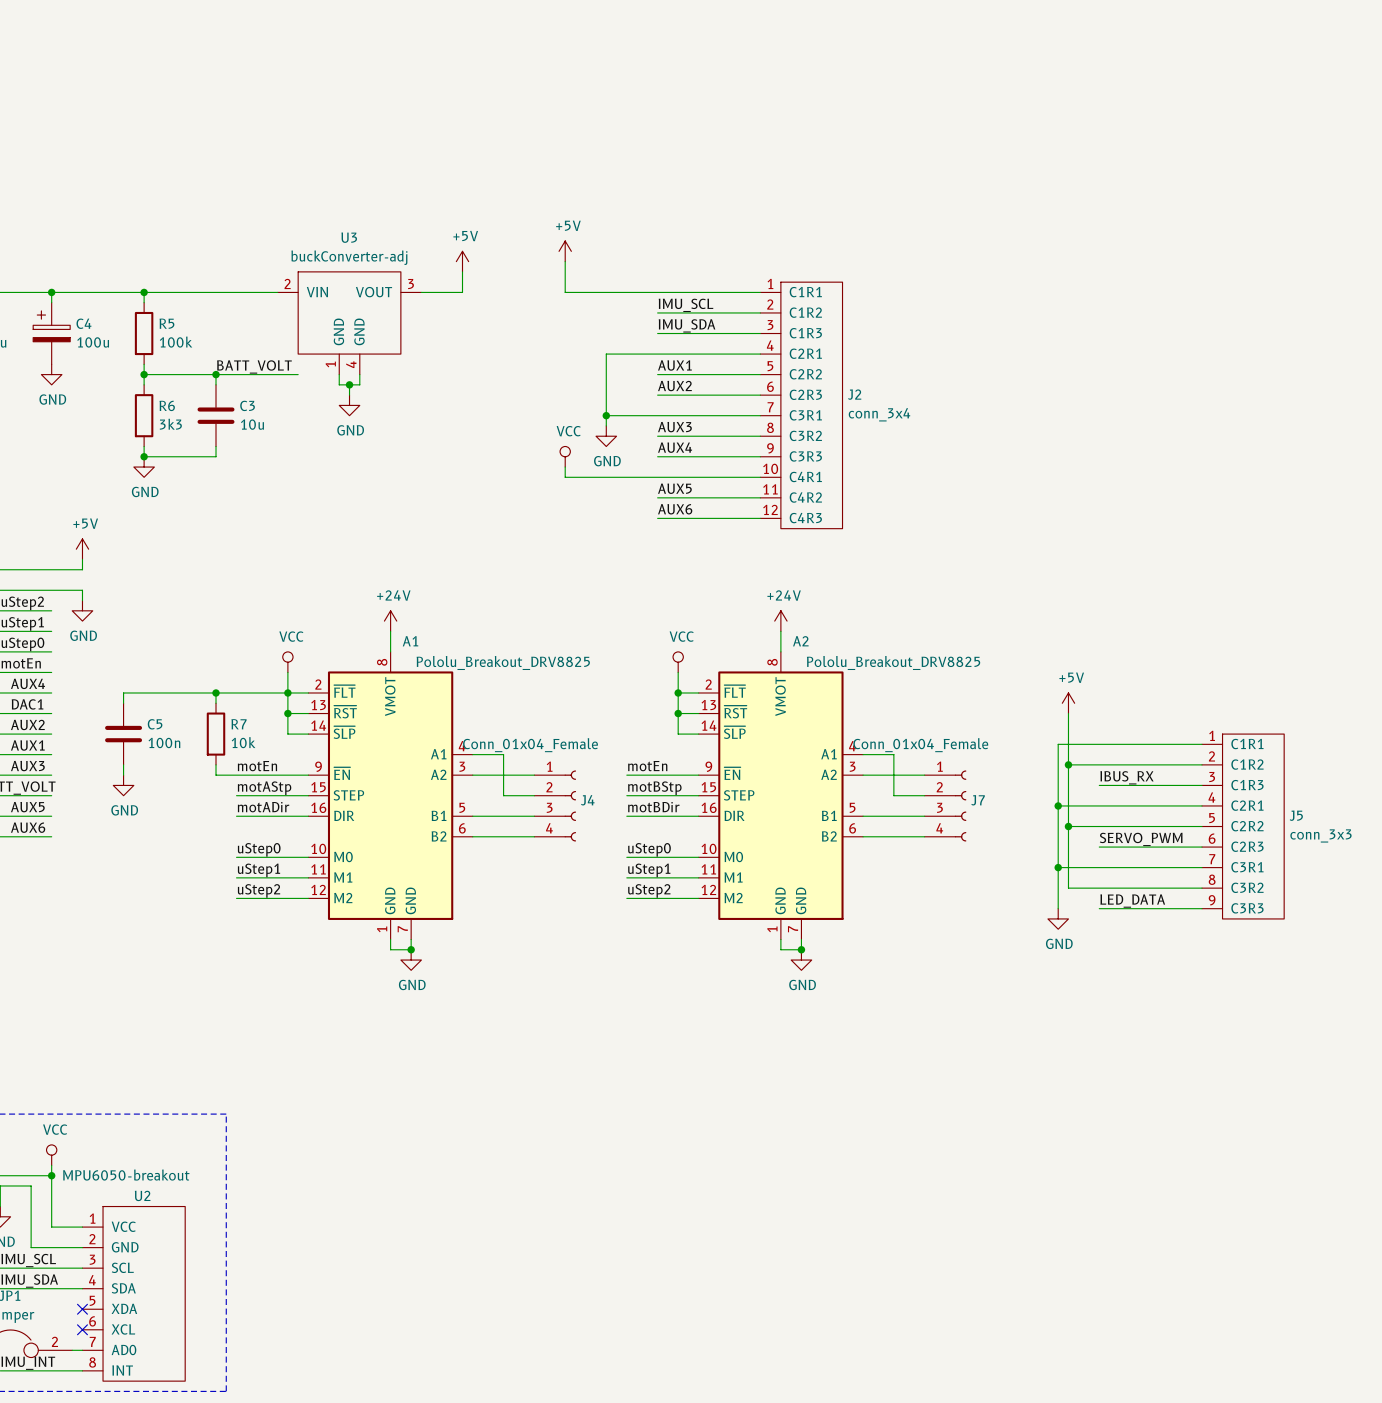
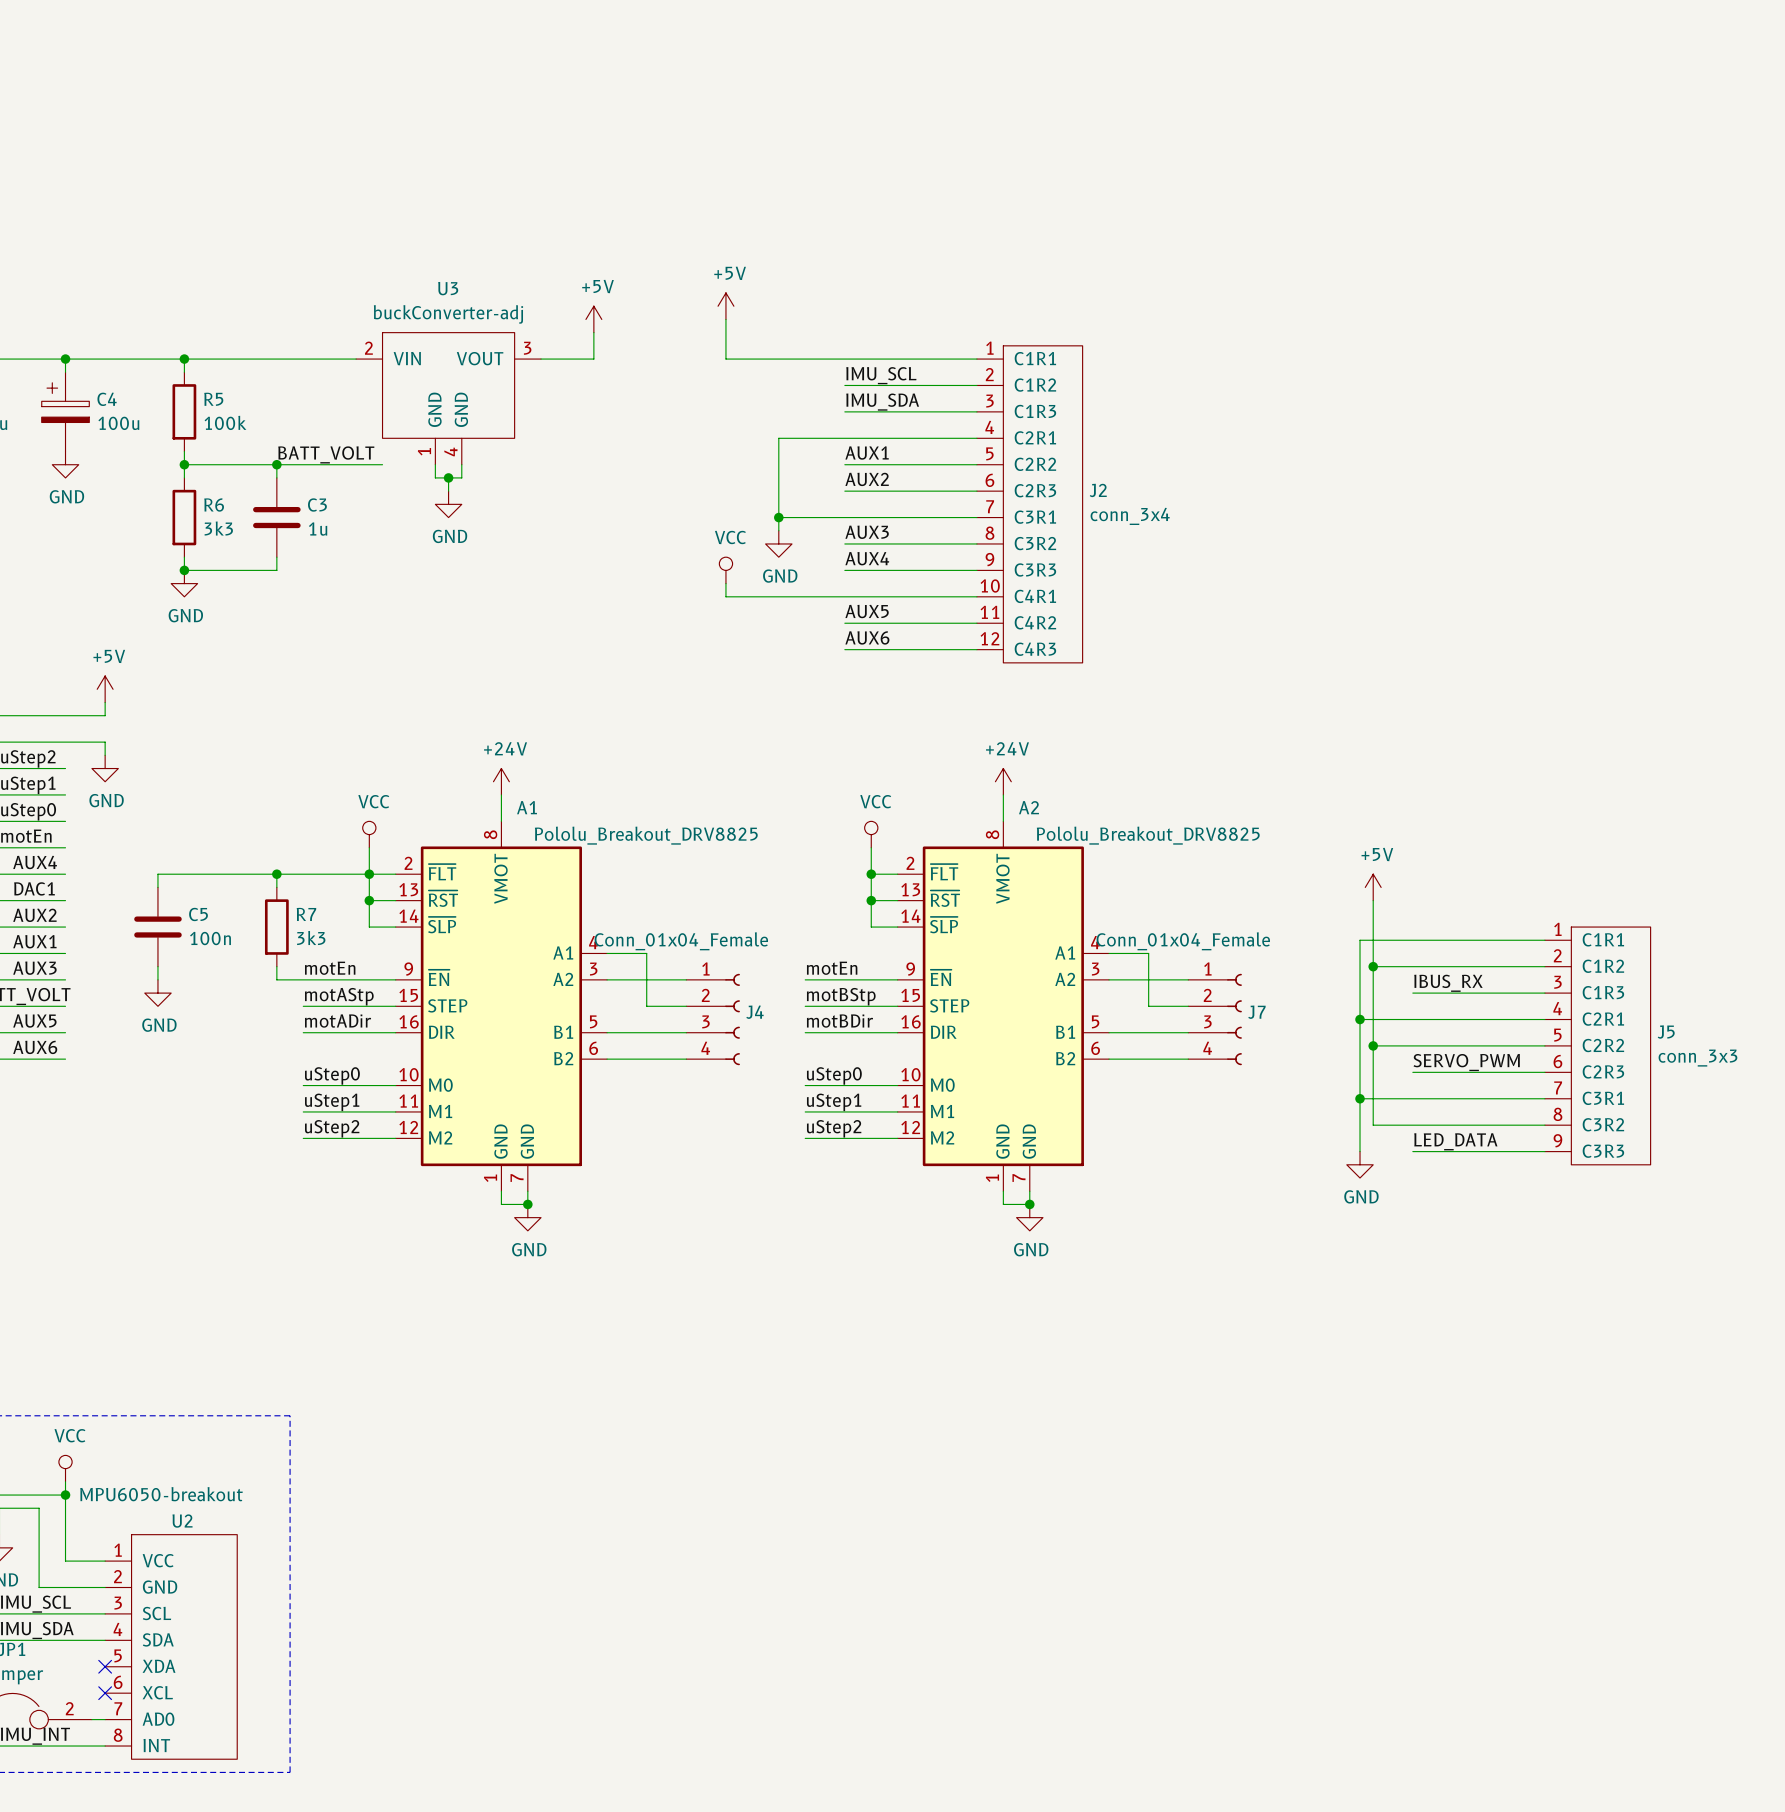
C3 value: 10u (252, 424) -> 1u (318, 529)
R7 value: 10k (243, 742) -> 3k3 (311, 938)

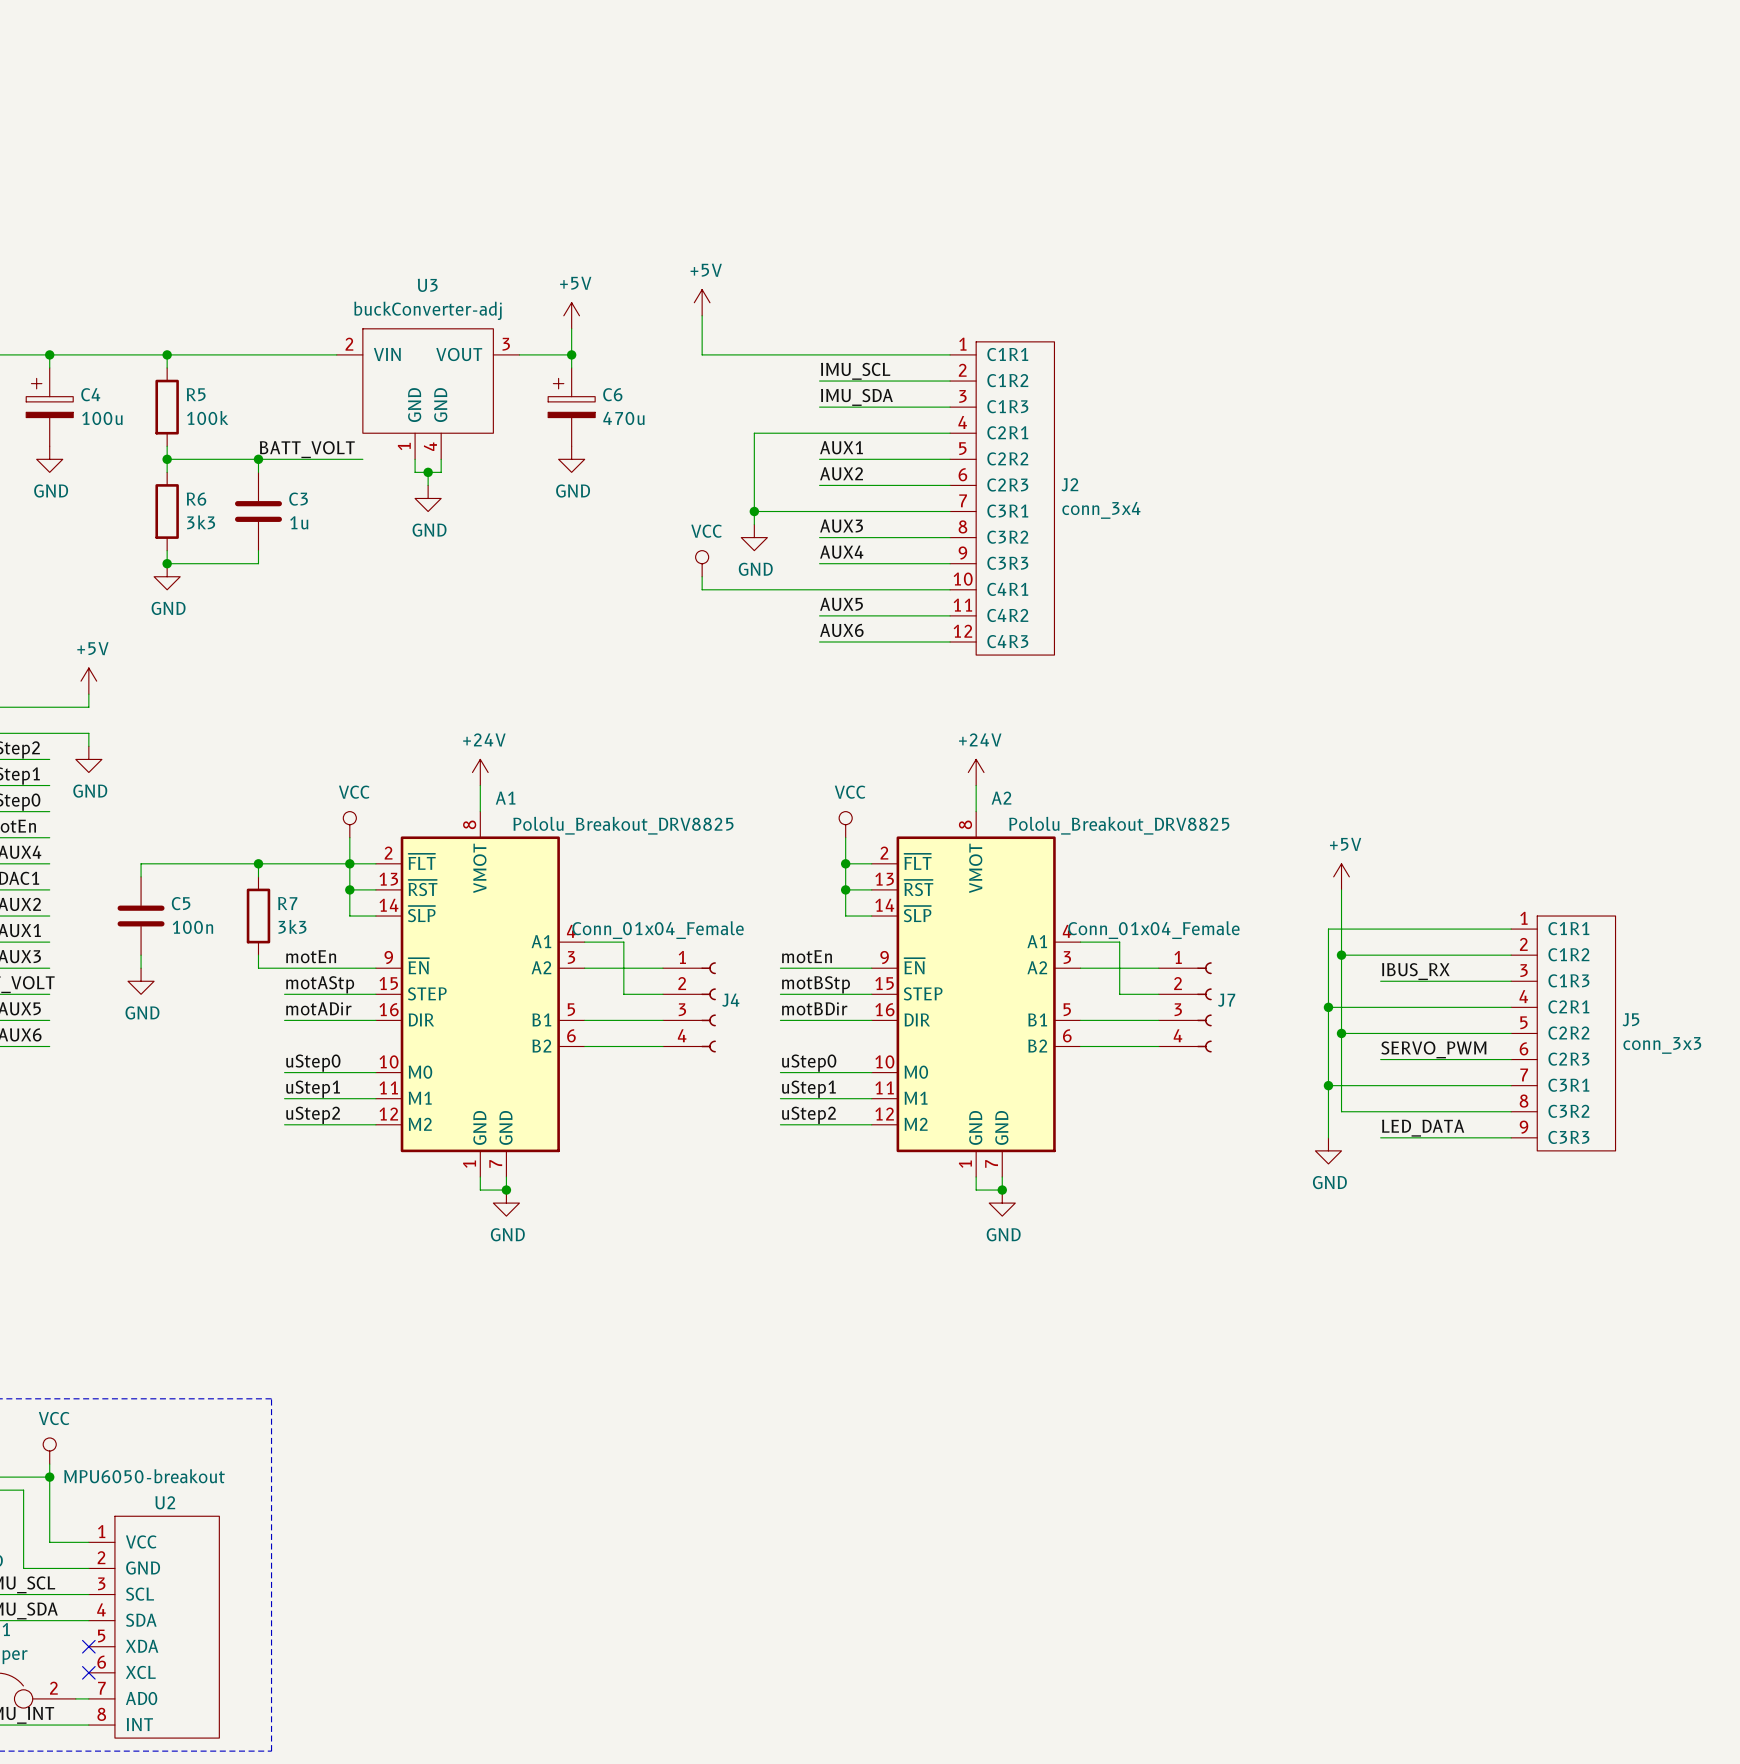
wire: none -> (571, 354) (571, 367)
junction: none -> (571, 354)
C6: none -> 470u (571, 407)
power symbol: none -> GND (571, 459)

